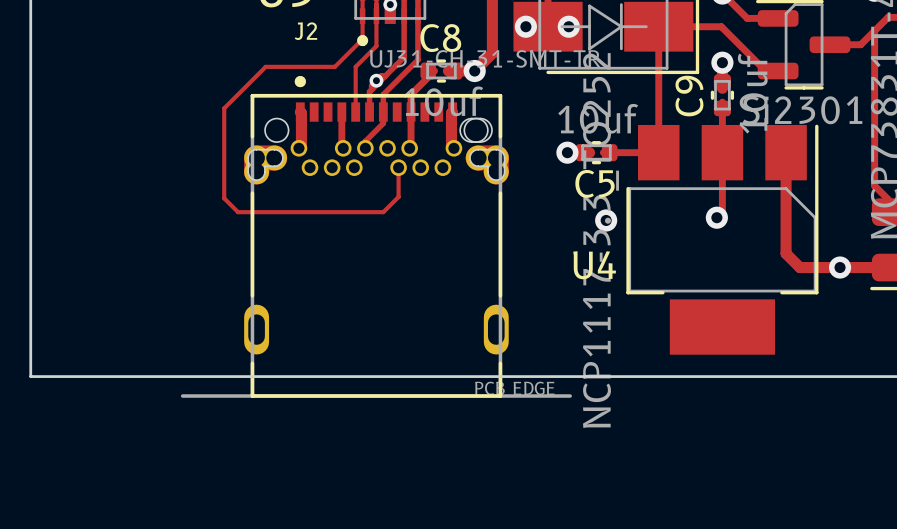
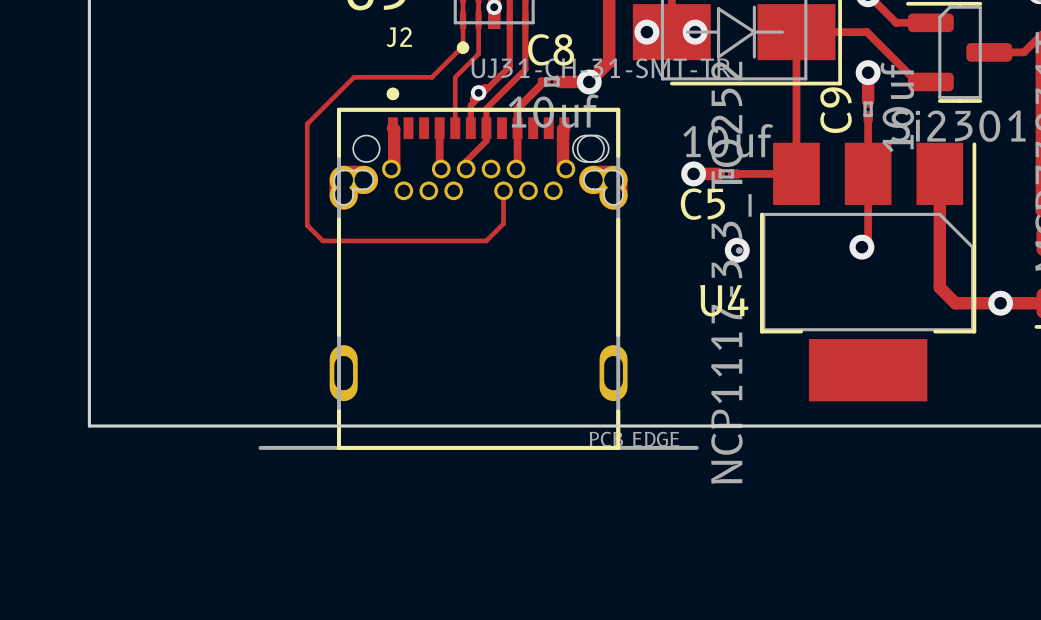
C8 footprint: [420, 59, 463, 83] -> [537, 77, 566, 87]
C9 footprint: [710, 74, 735, 117] -> [863, 95, 873, 124]
C5 footprint: [575, 141, 618, 165] -> [712, 169, 741, 179]

